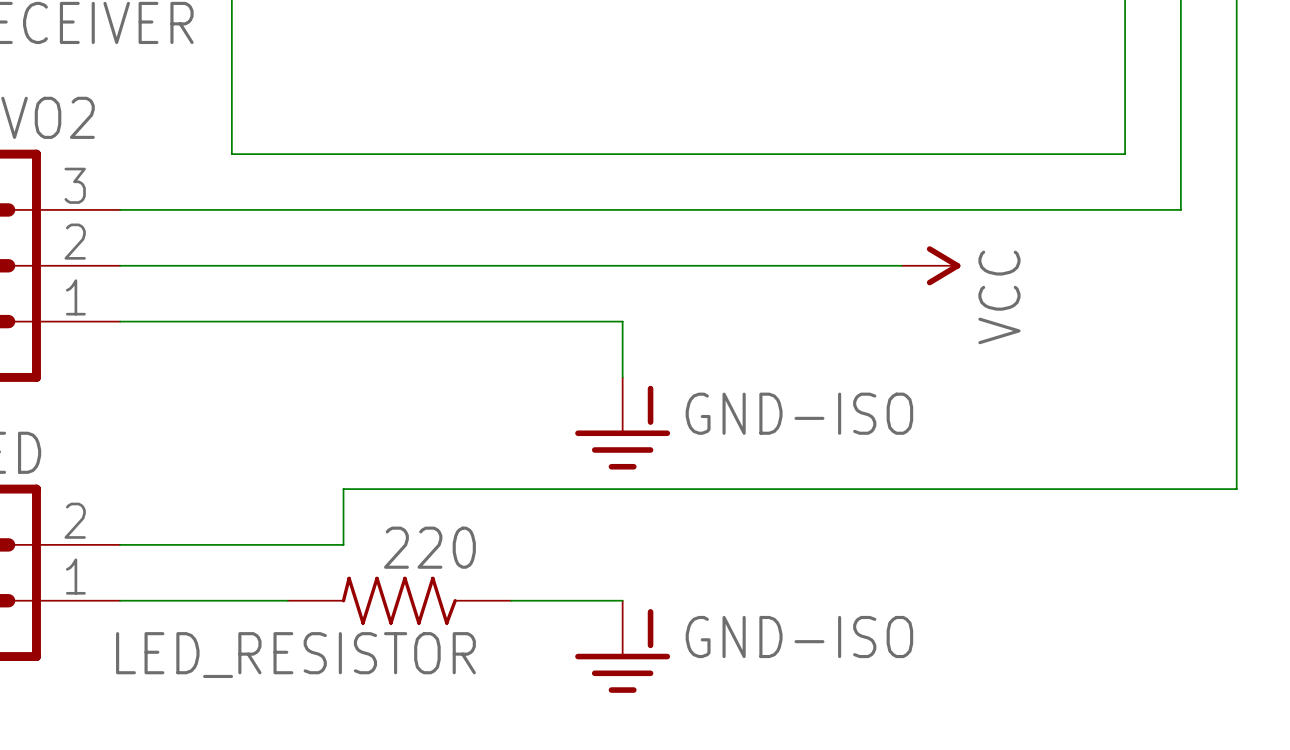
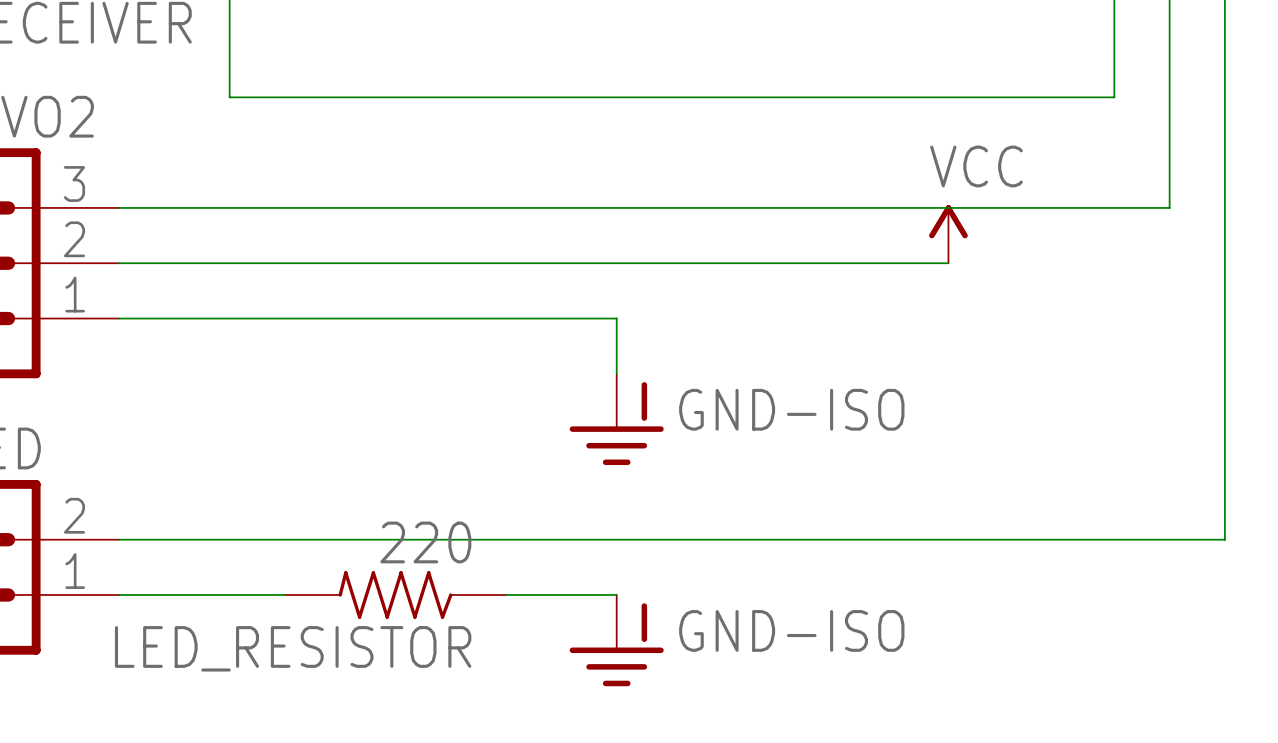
wire: (231, 98) (231, 154) (1125, 154) (1125, 98) -> (229, 97) (1114, 97)
power symbol position: VCC (931, 265) -> VCC (948, 234)
power symbol rotation: 0° (943, 265) -> 90° counterclockwise (948, 221)
wire: (1236, 489) (343, 489) (343, 544) -> (1224, 484) (1224, 539) (340, 539)

